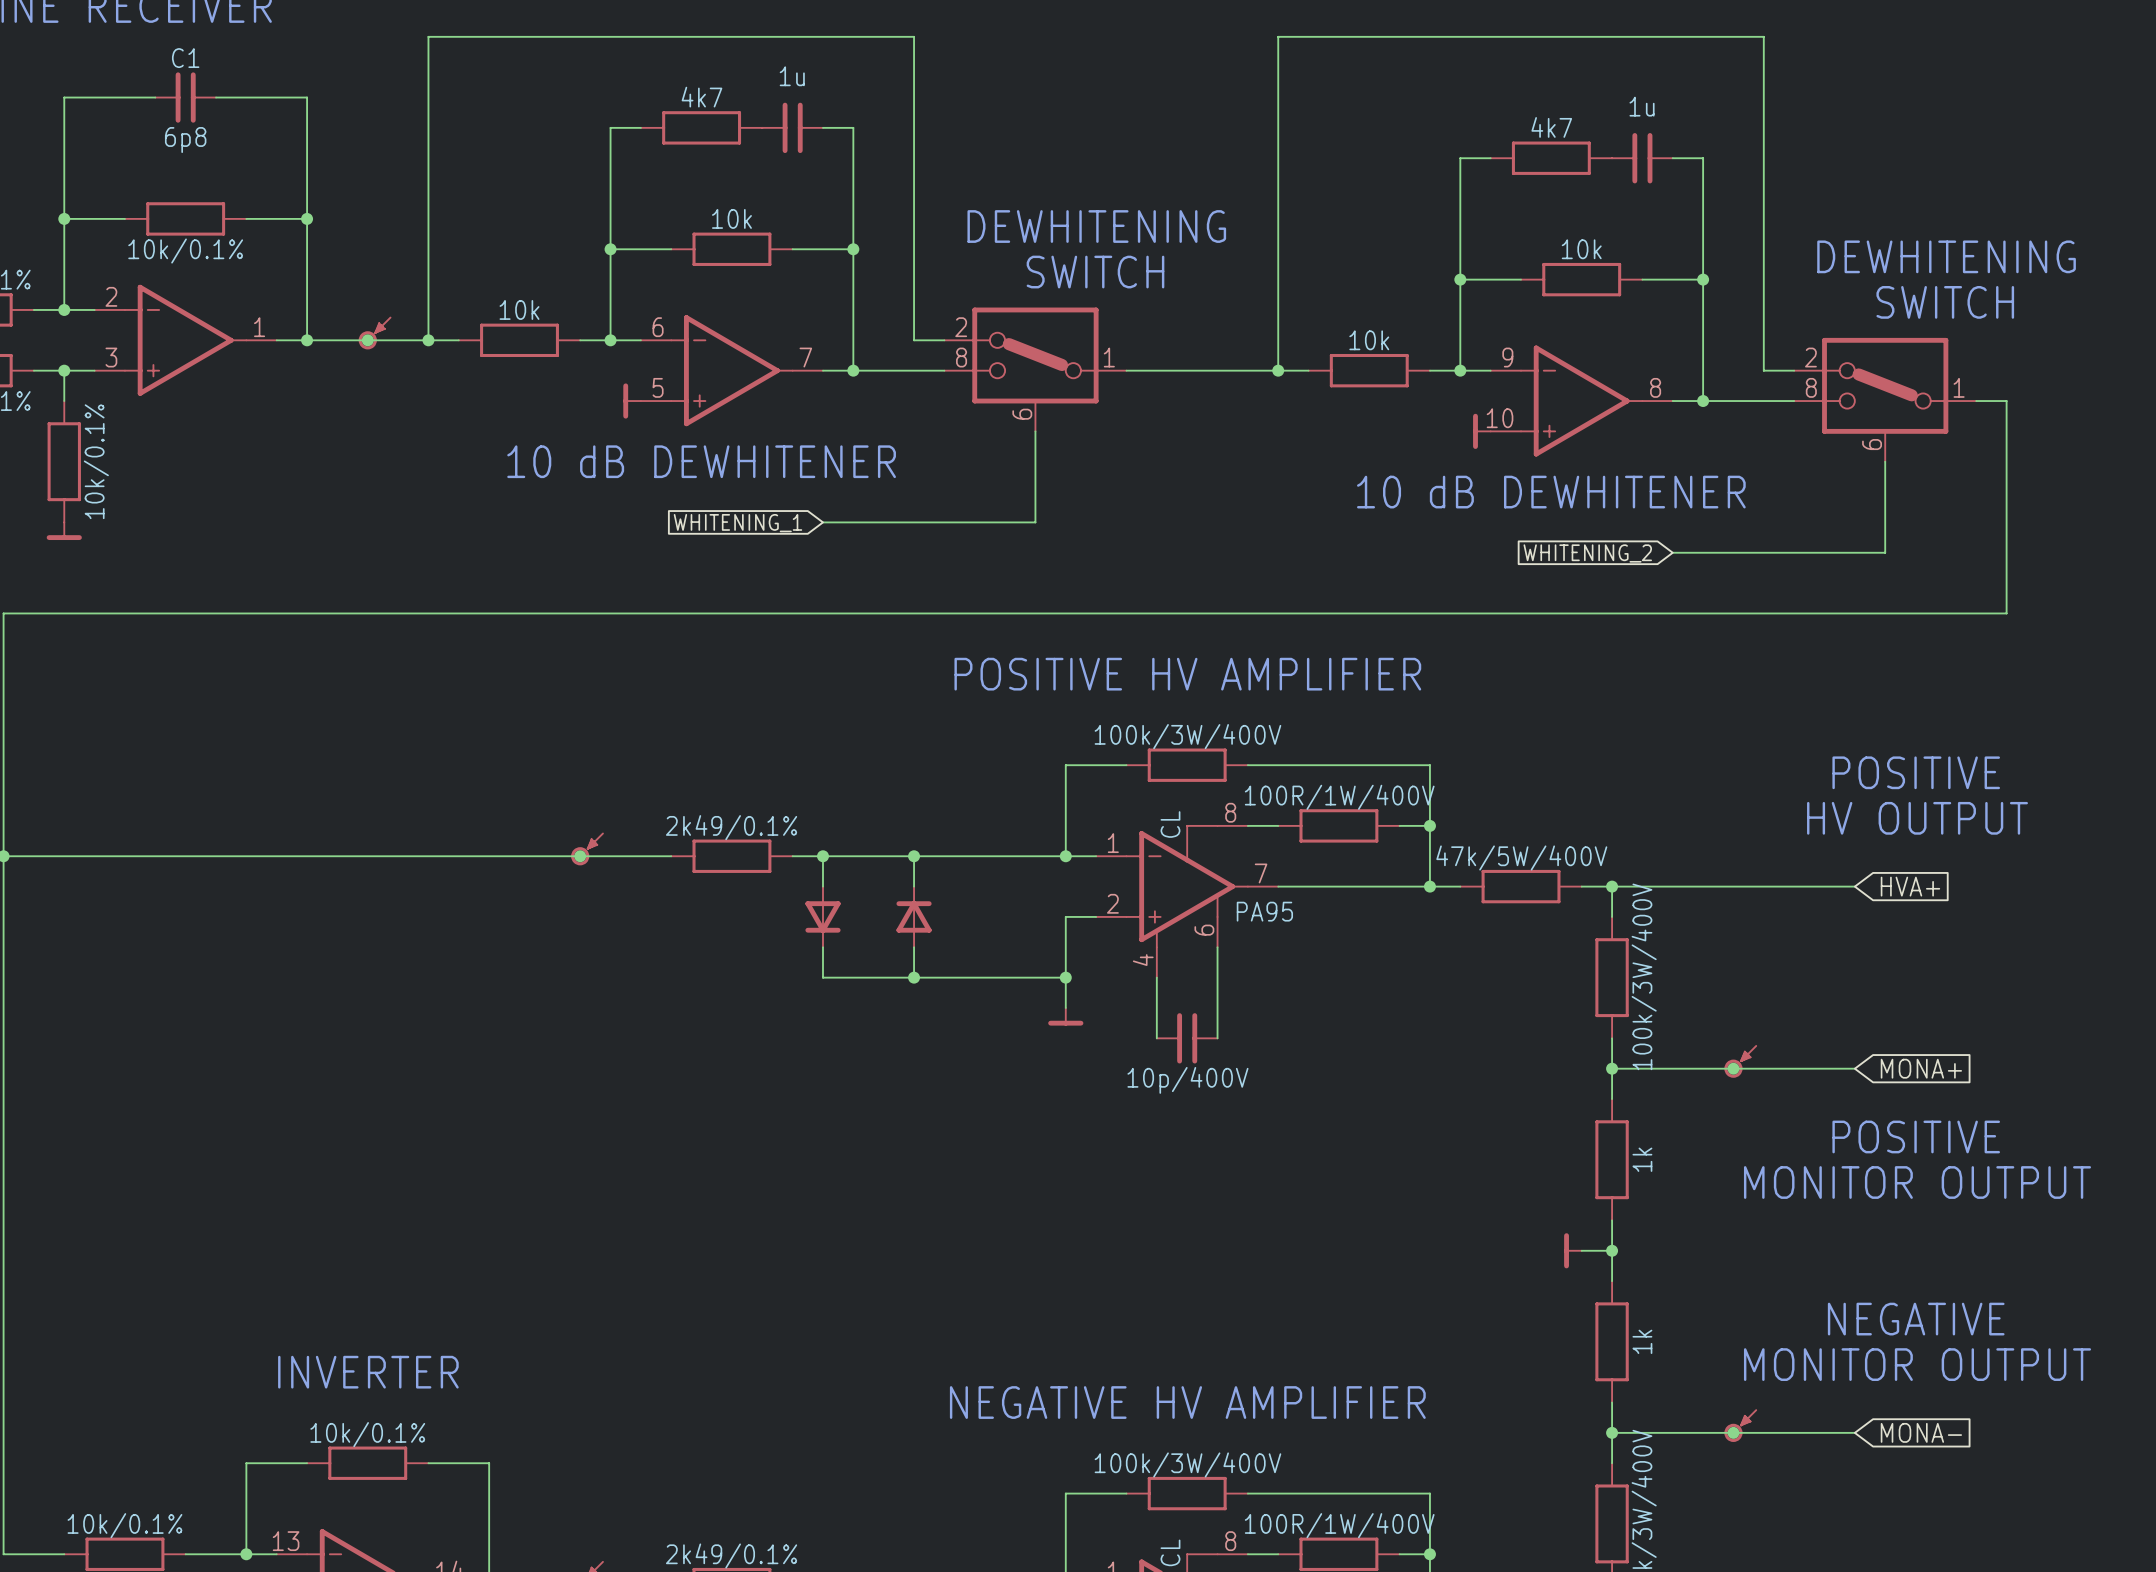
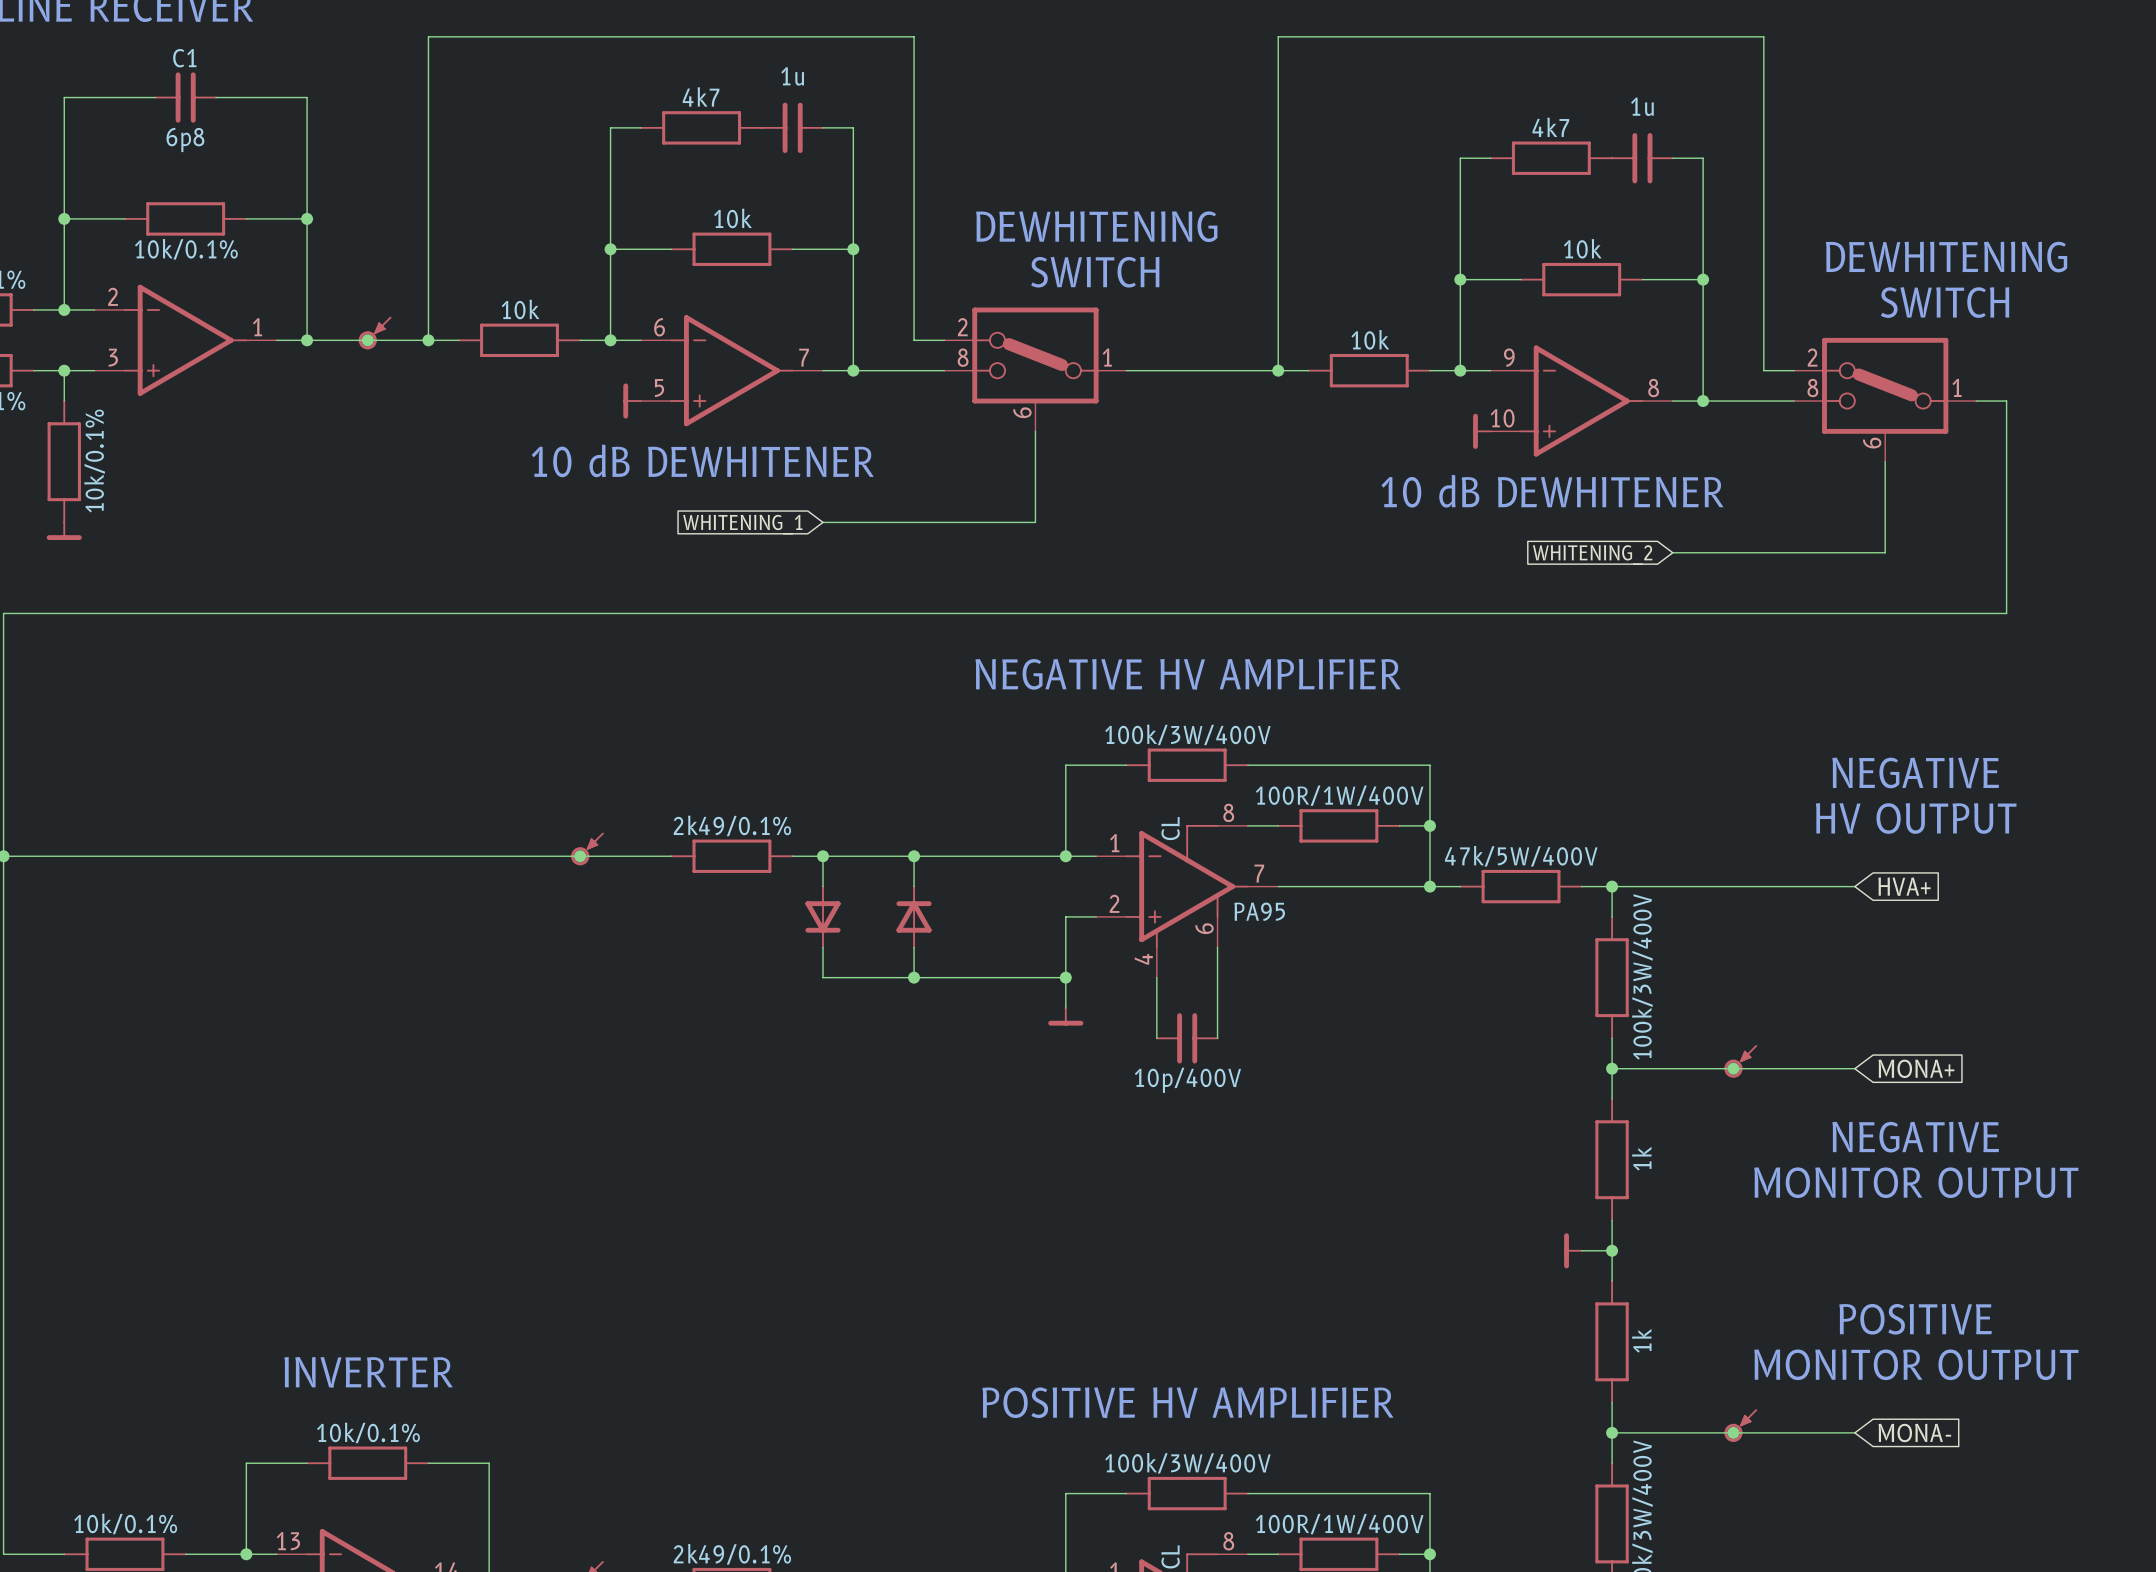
text: POSITIVE HV AMPLIFIER (1187, 674) -> NEGATIVE HV AMPLIFIER (1188, 674)
text: POSITIVE (1916, 772) -> NEGATIVE (1915, 772)
text: POSITIVE (1916, 1136) -> NEGATIVE (1915, 1137)
text: NEGATIVE (1916, 1319) -> POSITIVE (1915, 1319)
text: NEGATIVE HV AMPLIFIER (1187, 1402) -> POSITIVE HV AMPLIFIER (1187, 1402)

